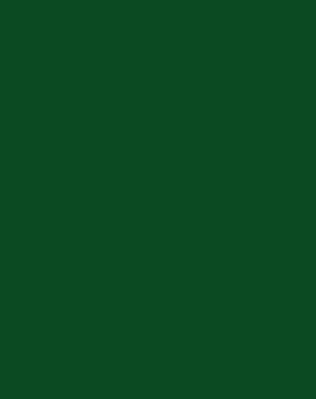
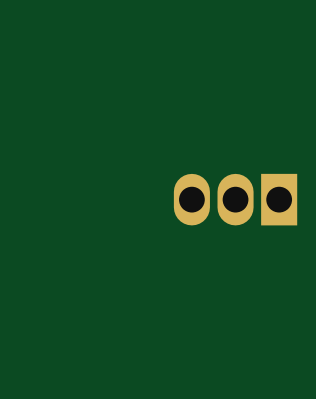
part: none -> (235, 199)

